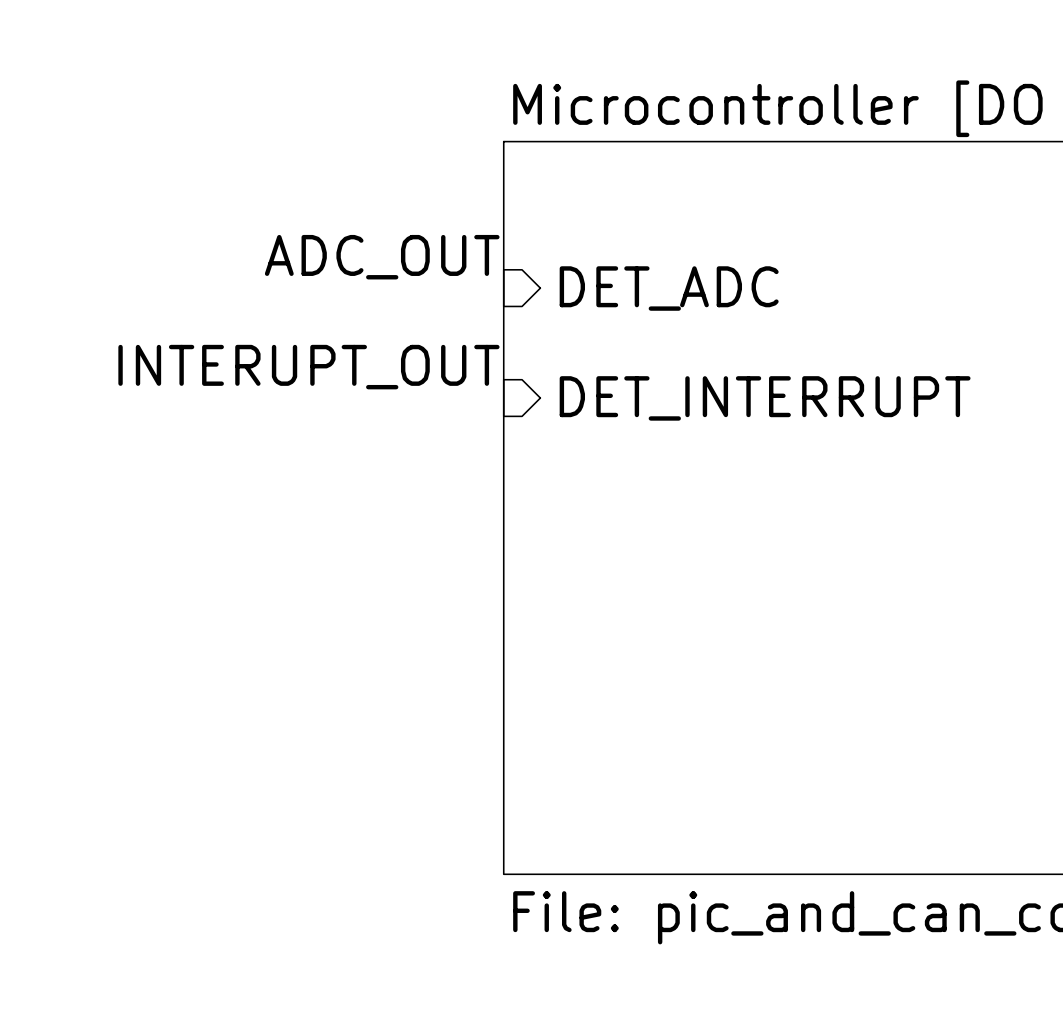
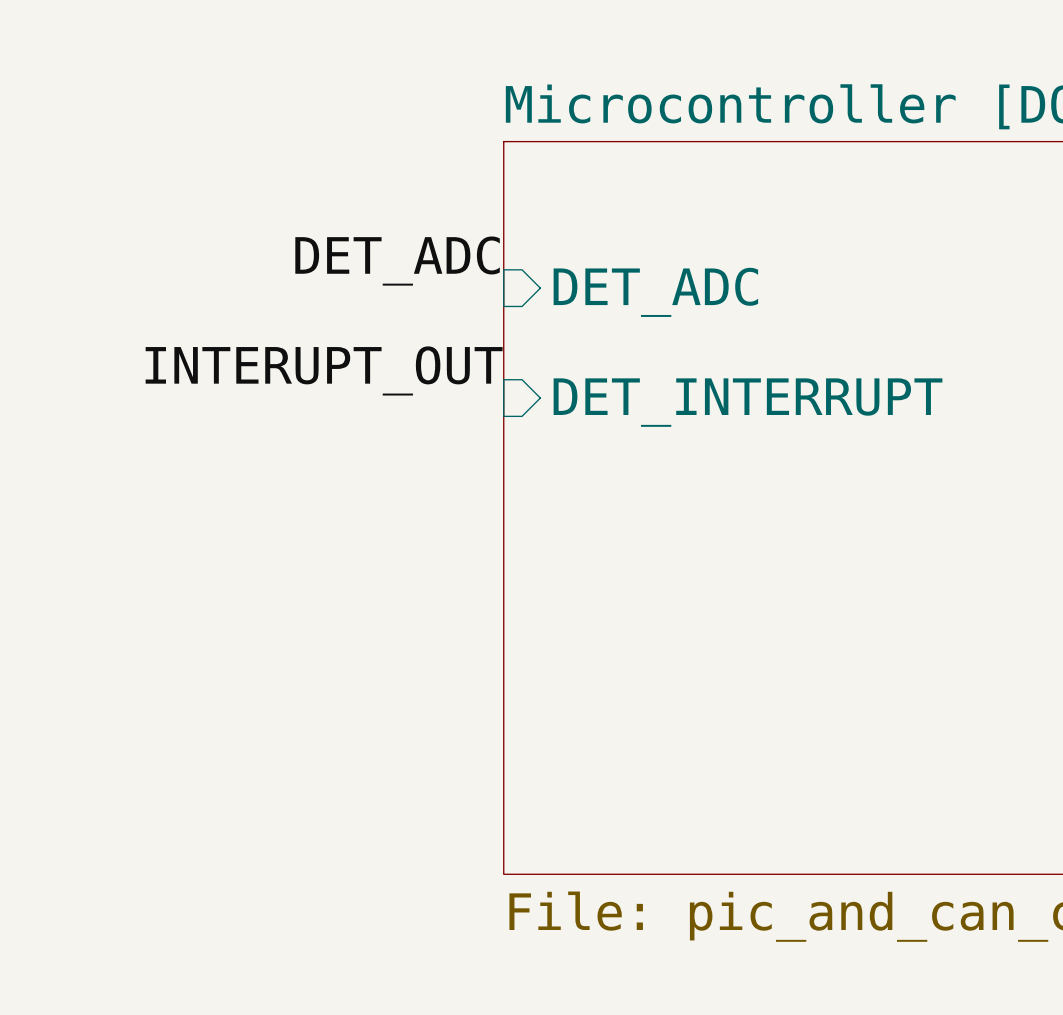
label: ADC_OUT (382, 257) -> DET_ADC (397, 261)

